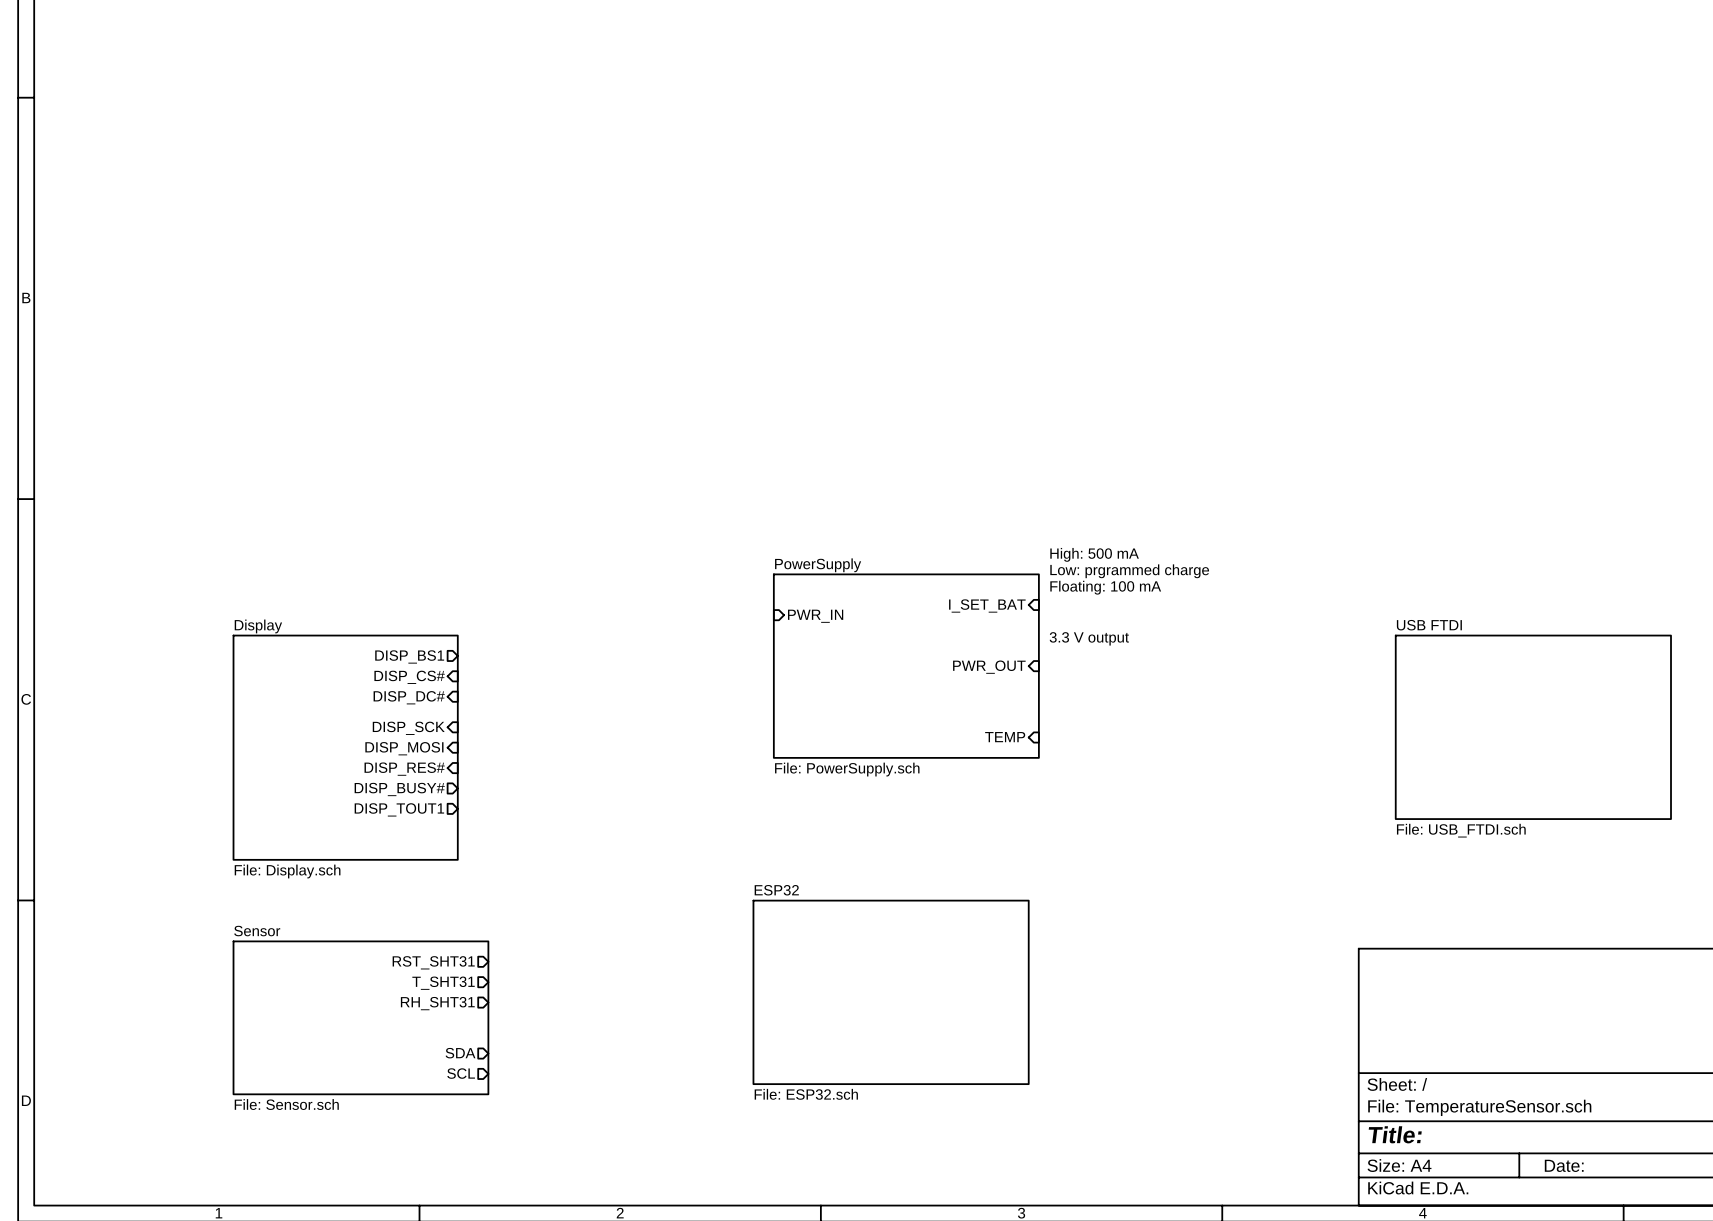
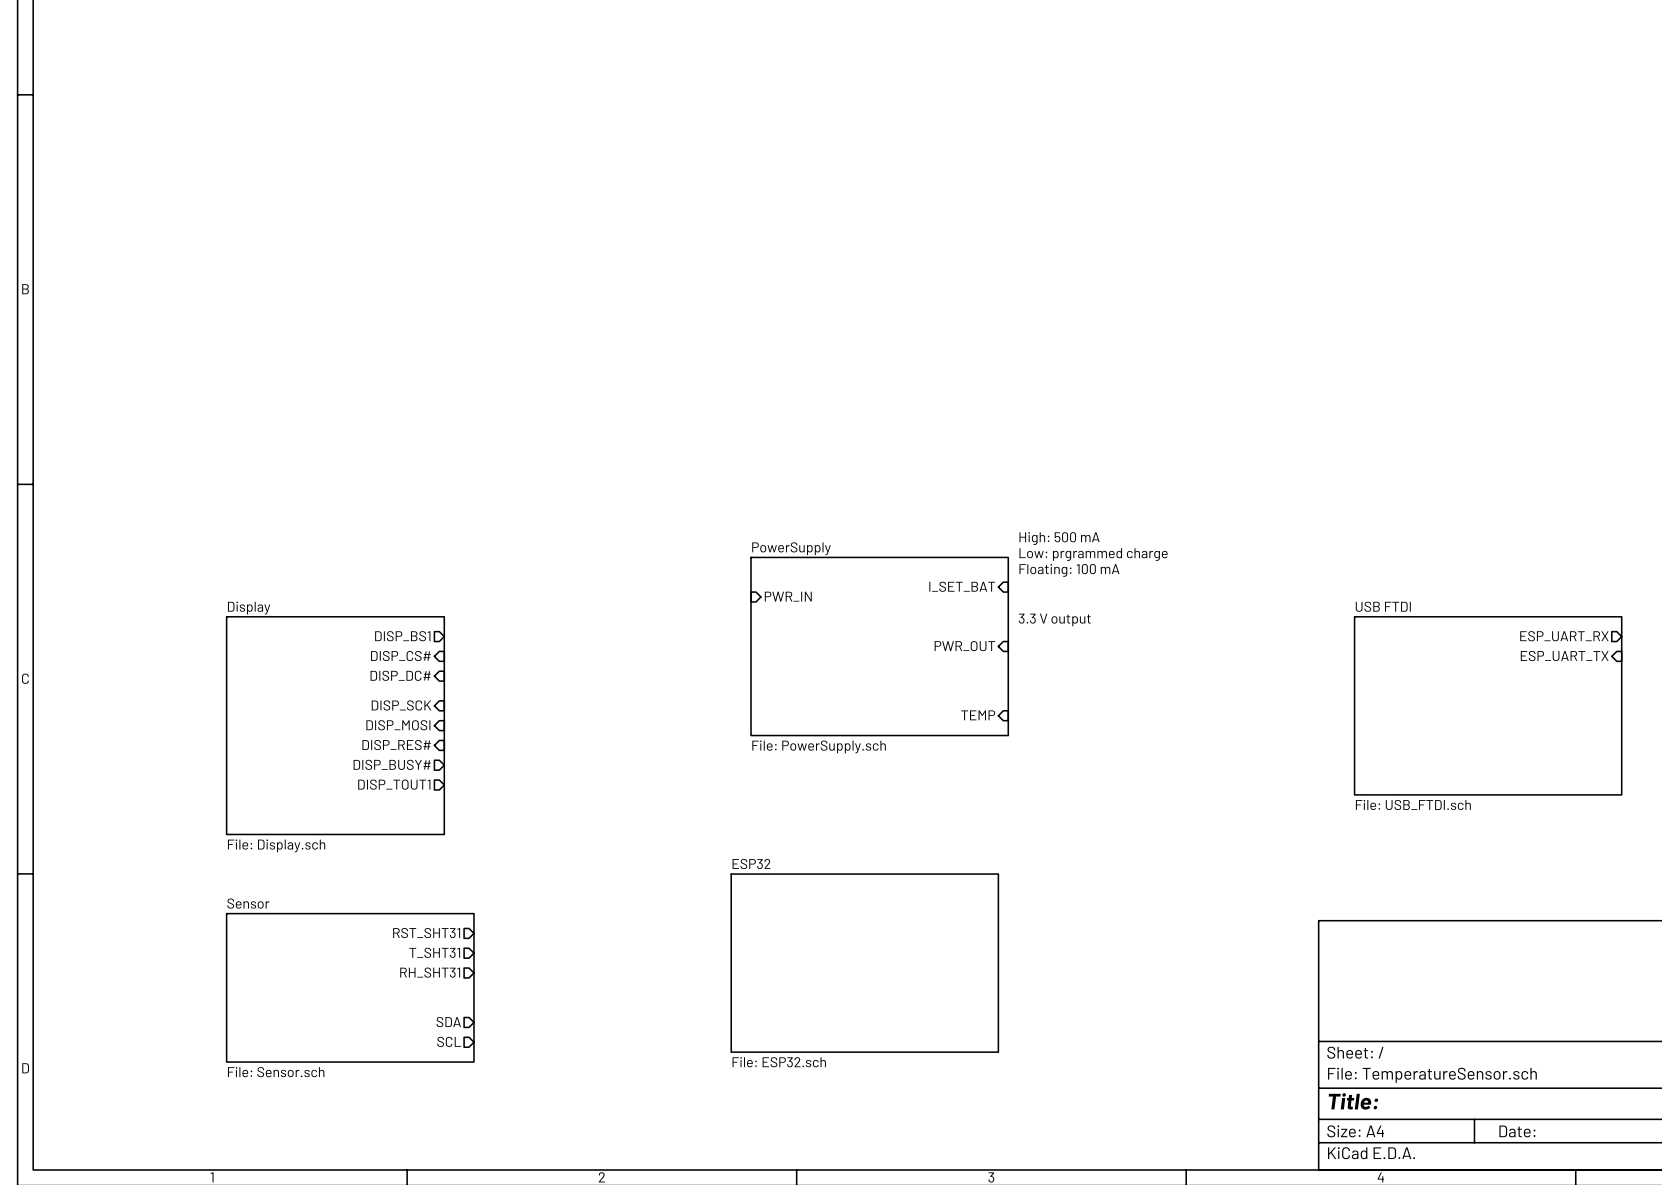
sheet pin: none -> ESP_UART_RX (1564, 636)
sheet pin: none -> ESP_UART_TX (1564, 656)

